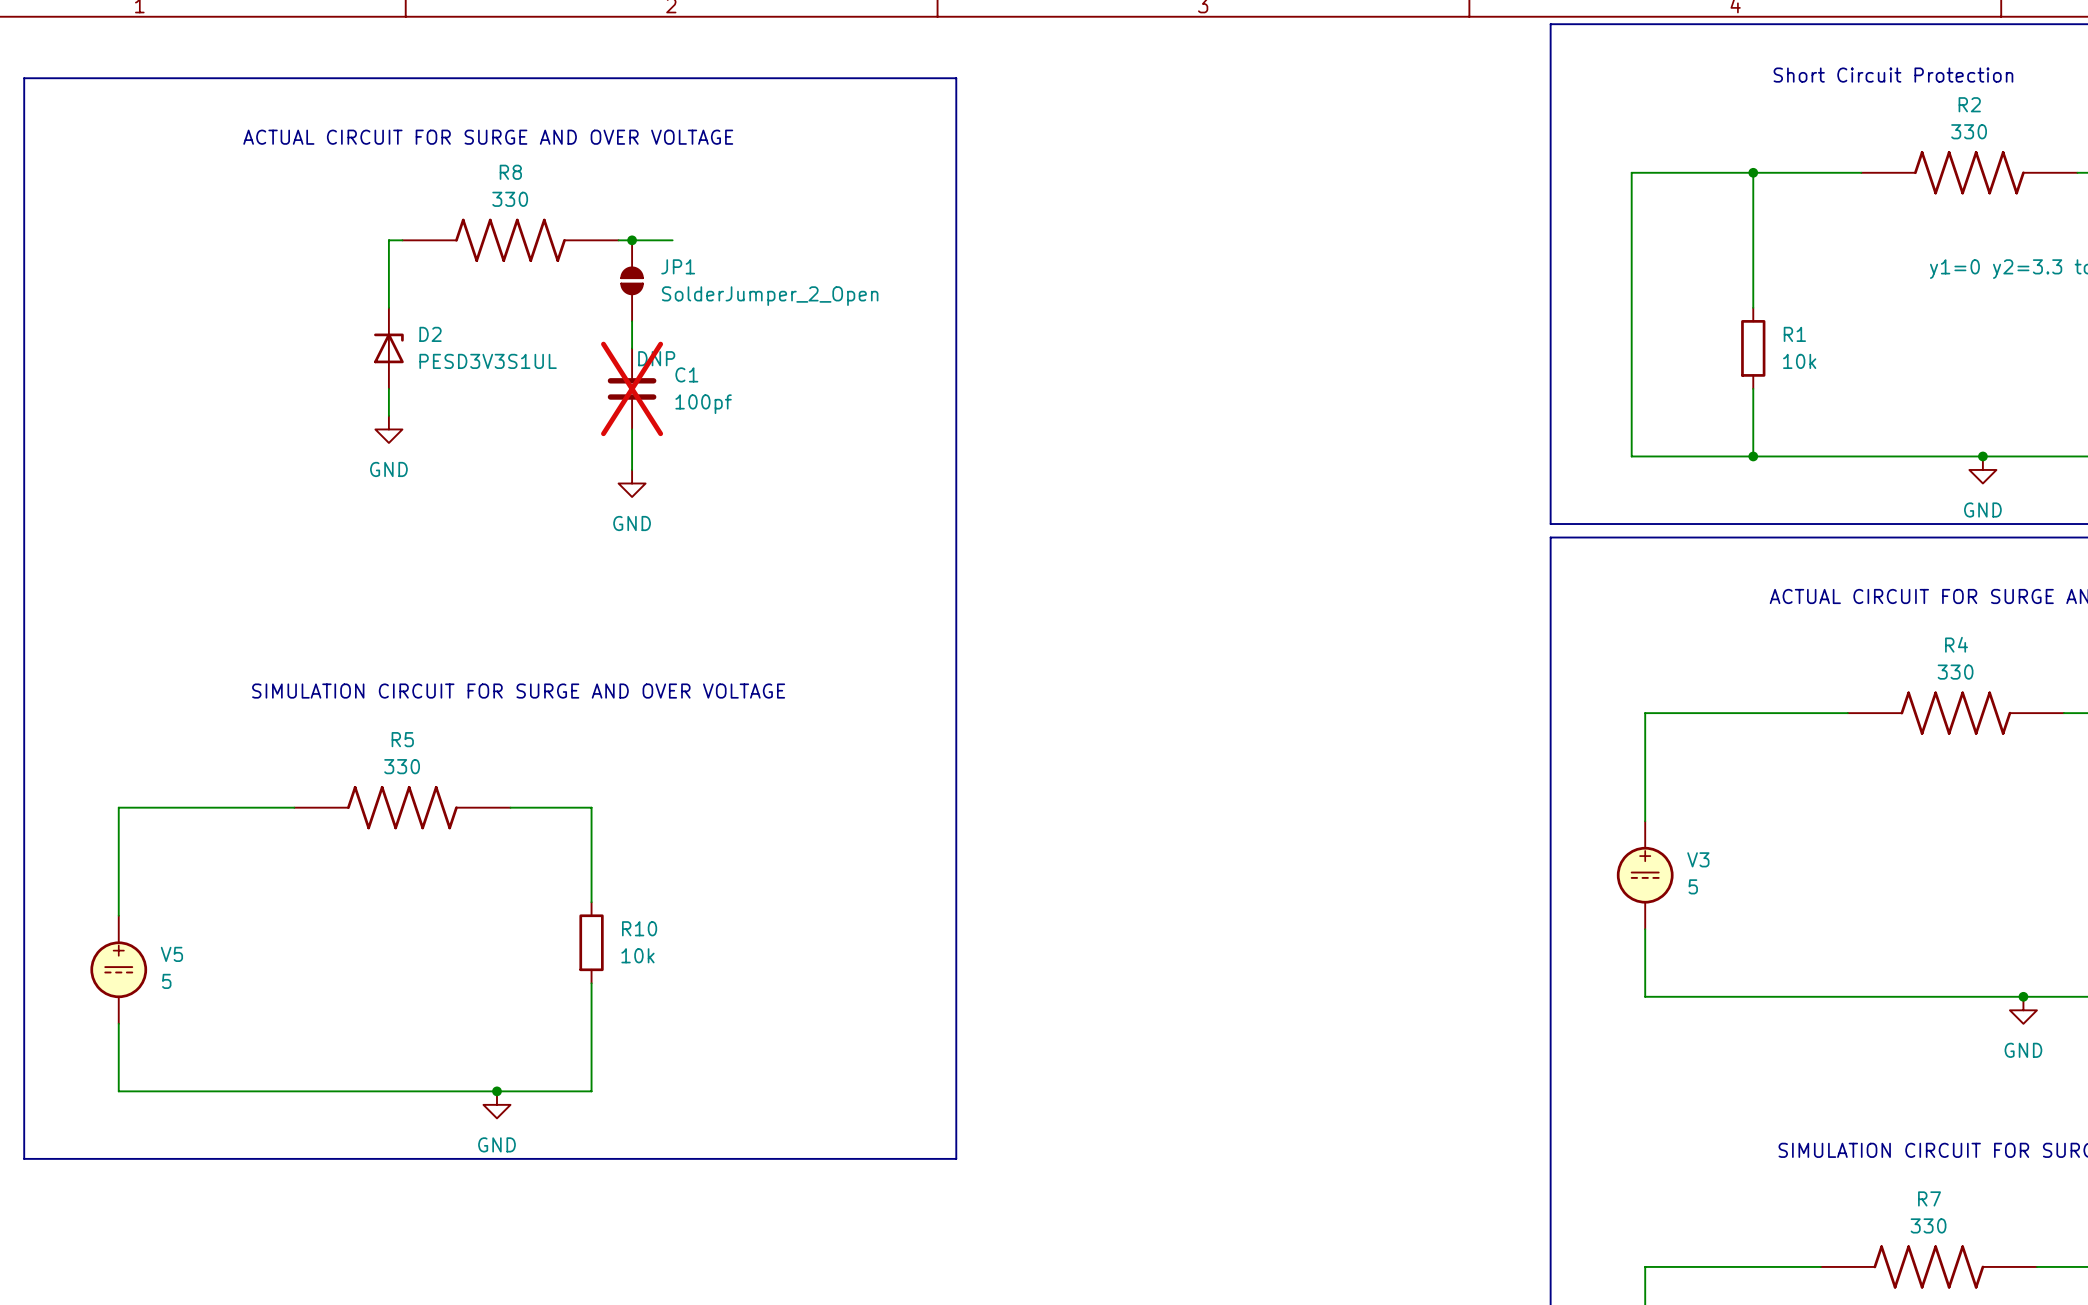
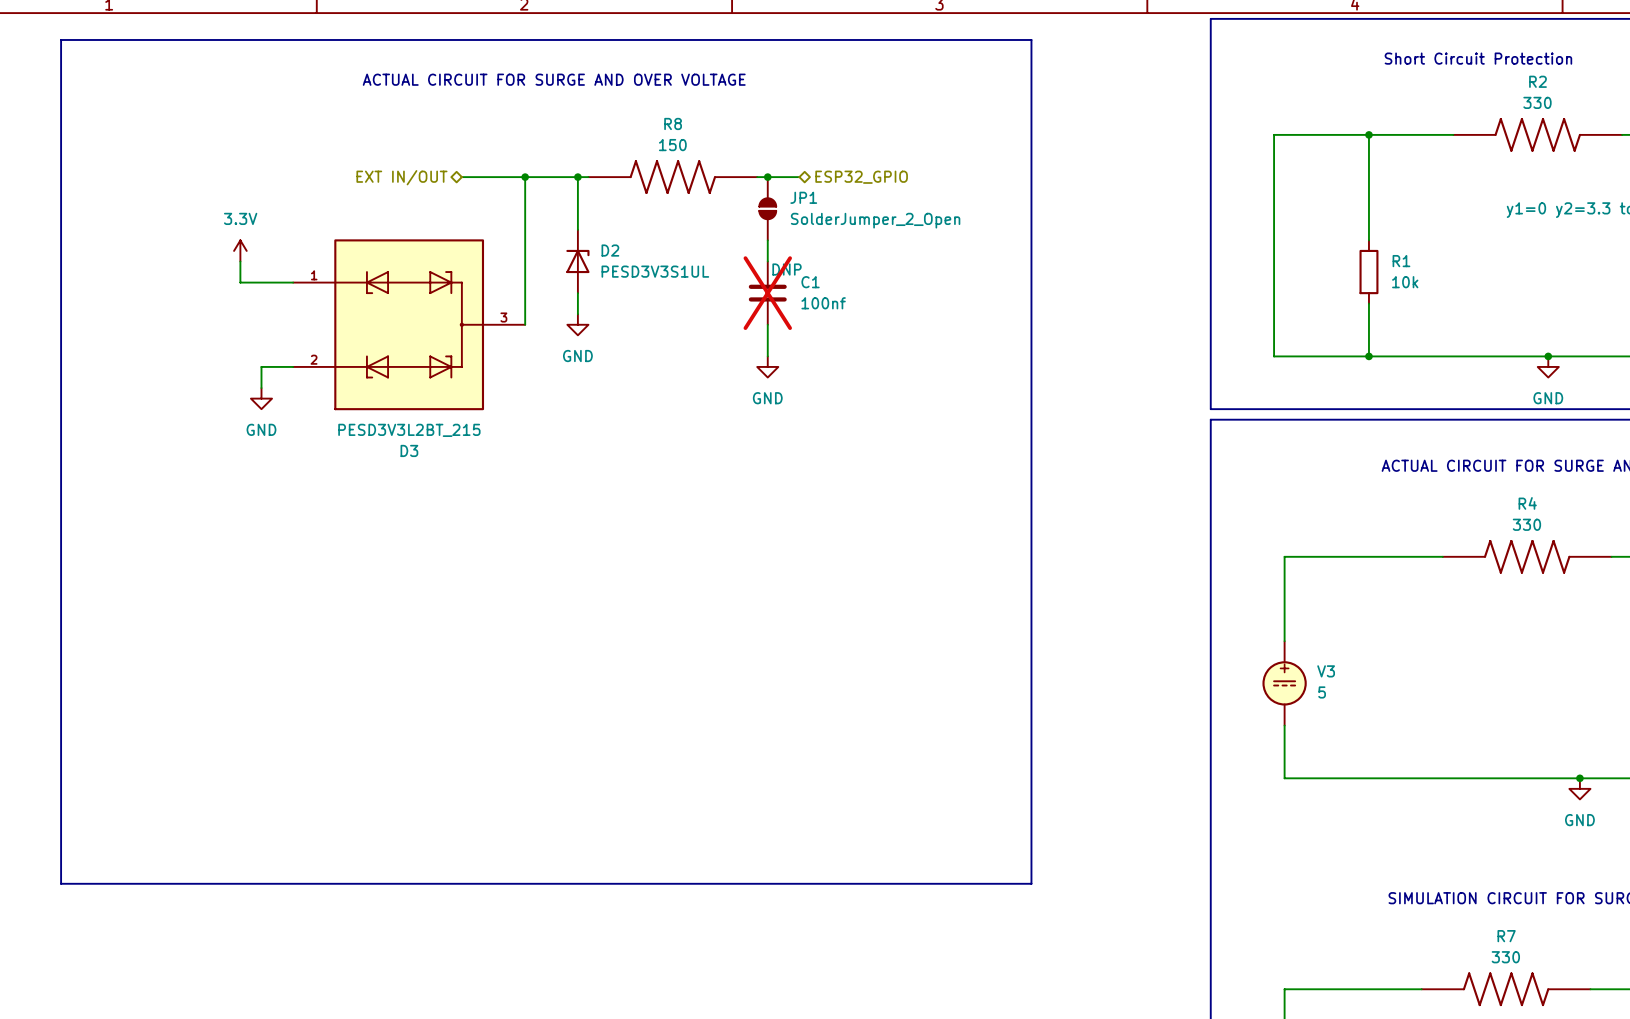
line: (24, 78) (956, 78) (956, 1158) (24, 1158) (24, 78) -> (61, 39) (61, 883) (1031, 883) (1031, 39) (61, 39)
text position: ACTUAL CIRCUIT FOR SURGE AND OVER VOLTAGE (488, 137) -> ACTUAL CIRCUIT FOR SURGE AND OVER VOLTAGE (554, 79)
R8 value: 330 (510, 199) -> 150 (672, 145)
wire: none -> (461, 177) (588, 177)
wire: none -> (525, 177) (525, 324)
wire: none -> (577, 177) (577, 229)
junction: none -> (577, 177)
wire: none -> (757, 177) (799, 177)
junction: none -> (767, 177)
hierarchical label: none -> ESP32_GPIO (861, 177)
hierarchical label: none -> EXT IN/OUT (401, 177)
wire: (402, 240) (388, 240) (388, 307) -> none
R8 position: (510, 240) -> (672, 177)
wire: (618, 240) (672, 240) -> none
junction position: (632, 240) -> (525, 177)
JP1 position: (632, 280) -> (767, 208)
wire: none -> (767, 240) (767, 261)
power symbol: none -> 3.3V (240, 250)
wire: (632, 321) (632, 348) -> (577, 293) (577, 314)
wire: none -> (240, 261) (240, 282) (293, 282)
D2 position: (388, 348) -> (577, 261)
wire: (388, 388) (388, 415) -> none
C1 position: (632, 388) -> (767, 293)
C1 value: 100pf (703, 404) -> 100nf (823, 303)
D3: none -> PESD3V3L2BT_215 (409, 324)
wire: none -> (767, 324) (767, 356)
power symbol position: GND (388, 429) -> GND (261, 398)
wire: (632, 429) (632, 469) -> none
wire: none -> (293, 366) (261, 366) (261, 388)
power symbol: none -> GND (767, 366)
power symbol position: GND (632, 483) -> GND (577, 324)
text: SIMULATION CIRCUIT FOR SURGE AND OVER VOLTAGE (518, 691) -> none
wire: (294, 807) (118, 807) (118, 915) -> none
R5: 330 (402, 807) -> none
wire: (510, 807) (591, 807) (591, 902) -> none
R10: 10k (591, 942) -> none
V5: 5 (118, 969) -> none
wire: (591, 983) (591, 1091) (118, 1091) (118, 1023) -> none
junction: (496, 1091) -> none
power symbol: GND (496, 1104) -> none

